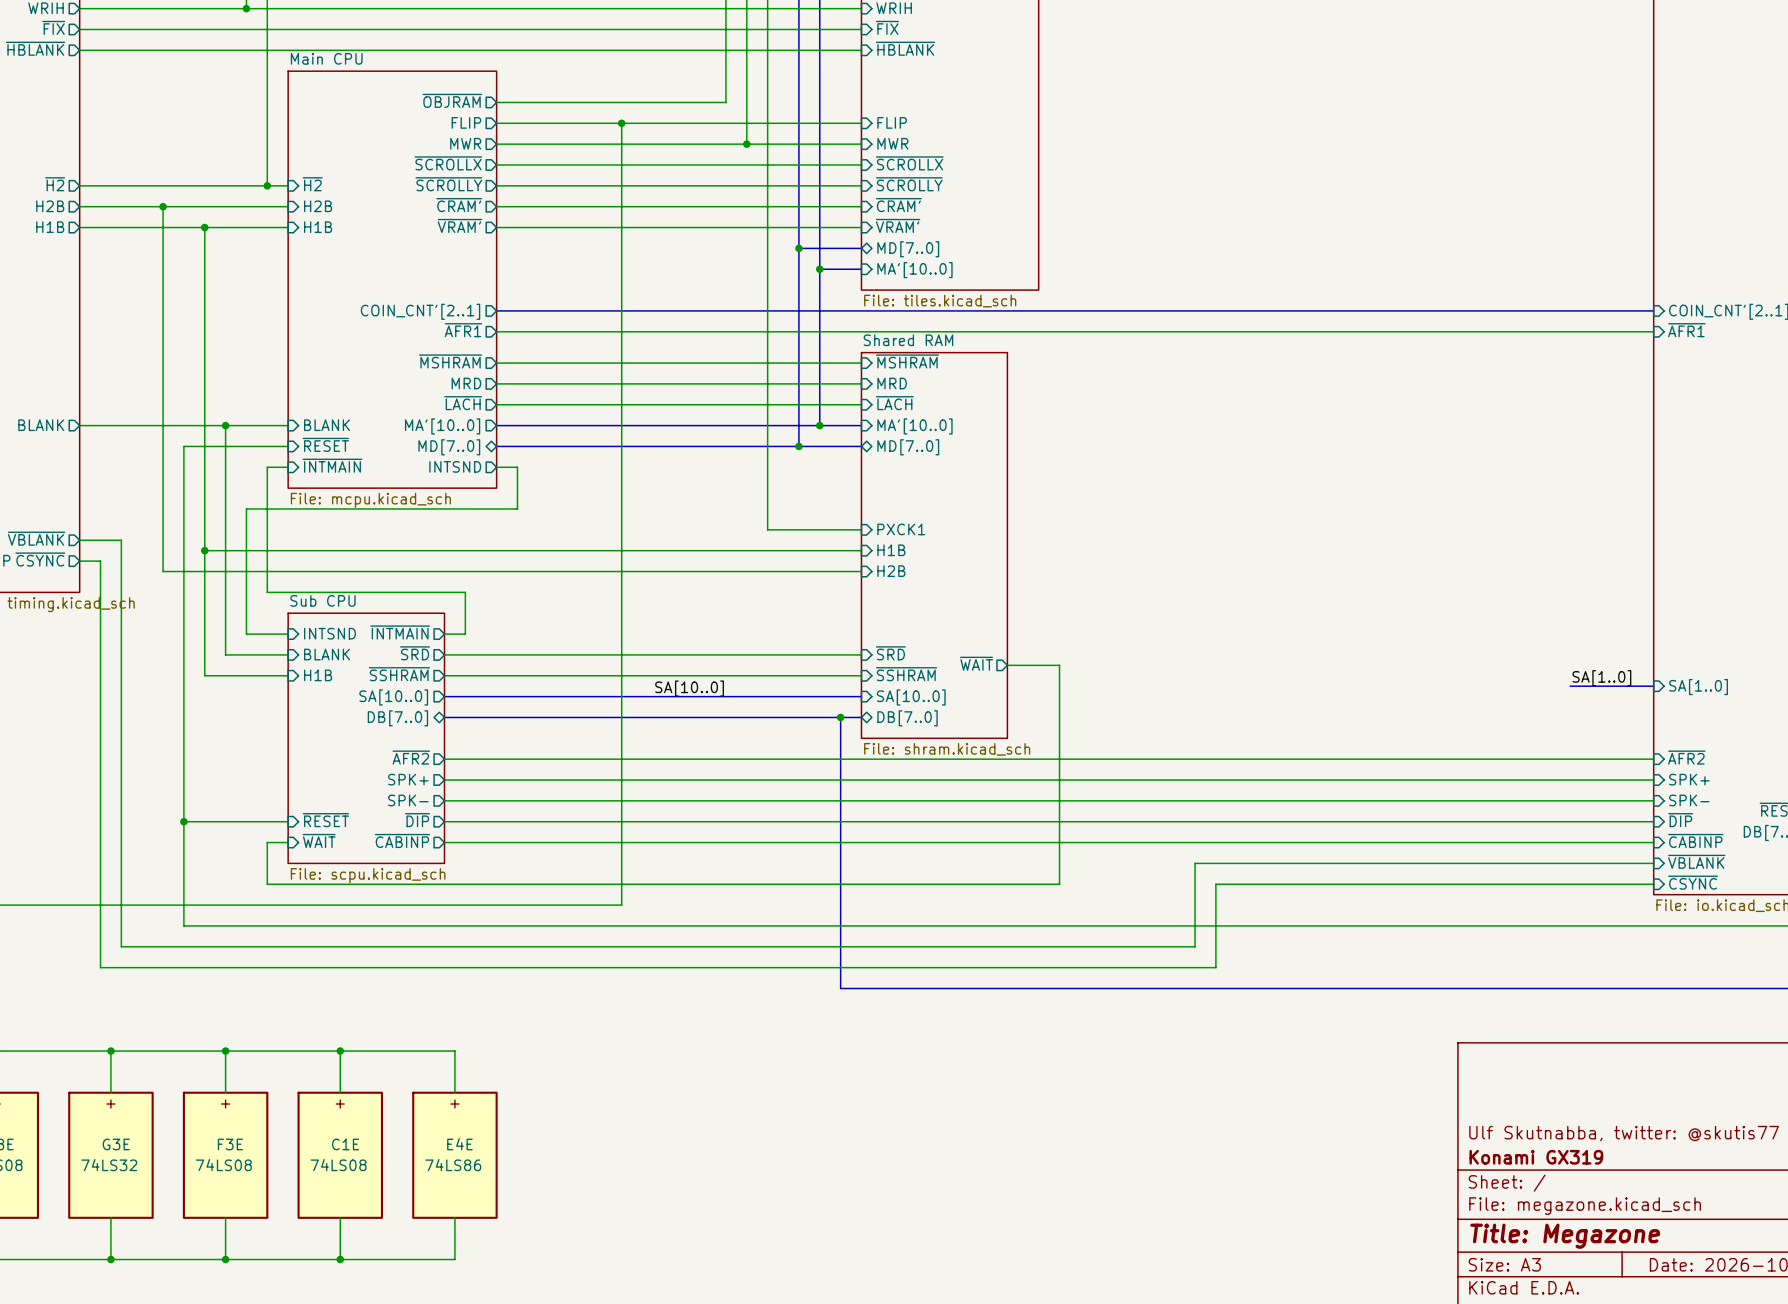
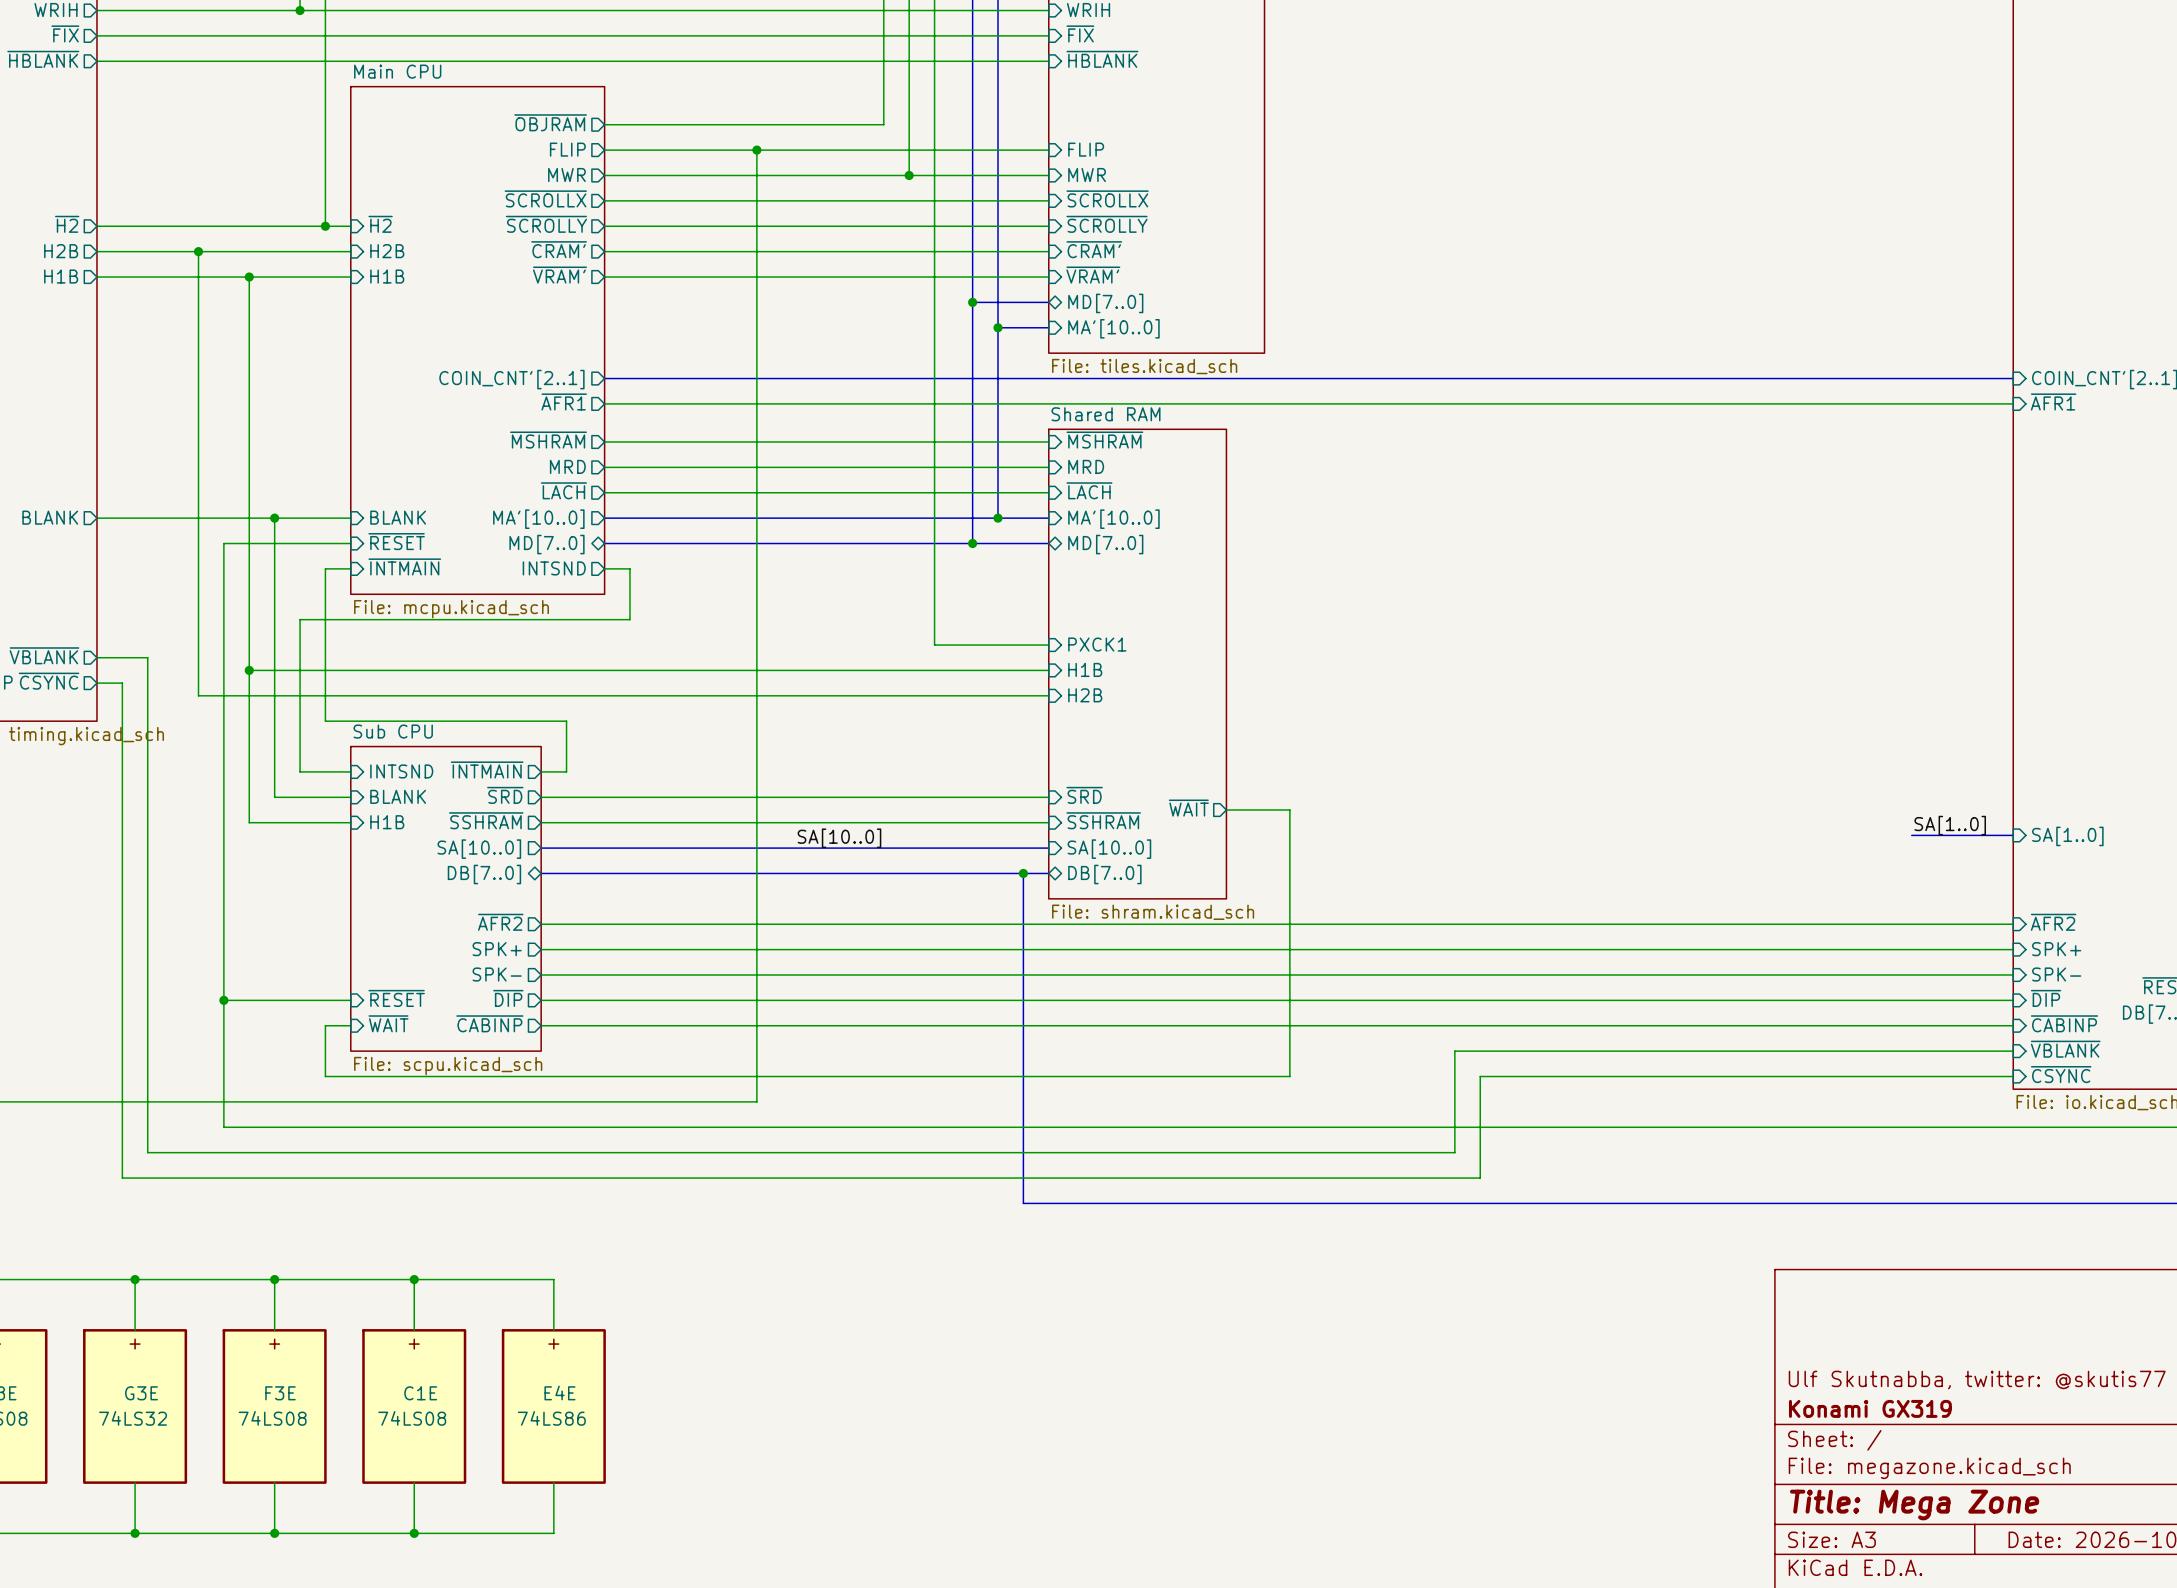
title block: Title: Megazone (1565, 1236) -> Title: Mega Zone (1914, 1504)

